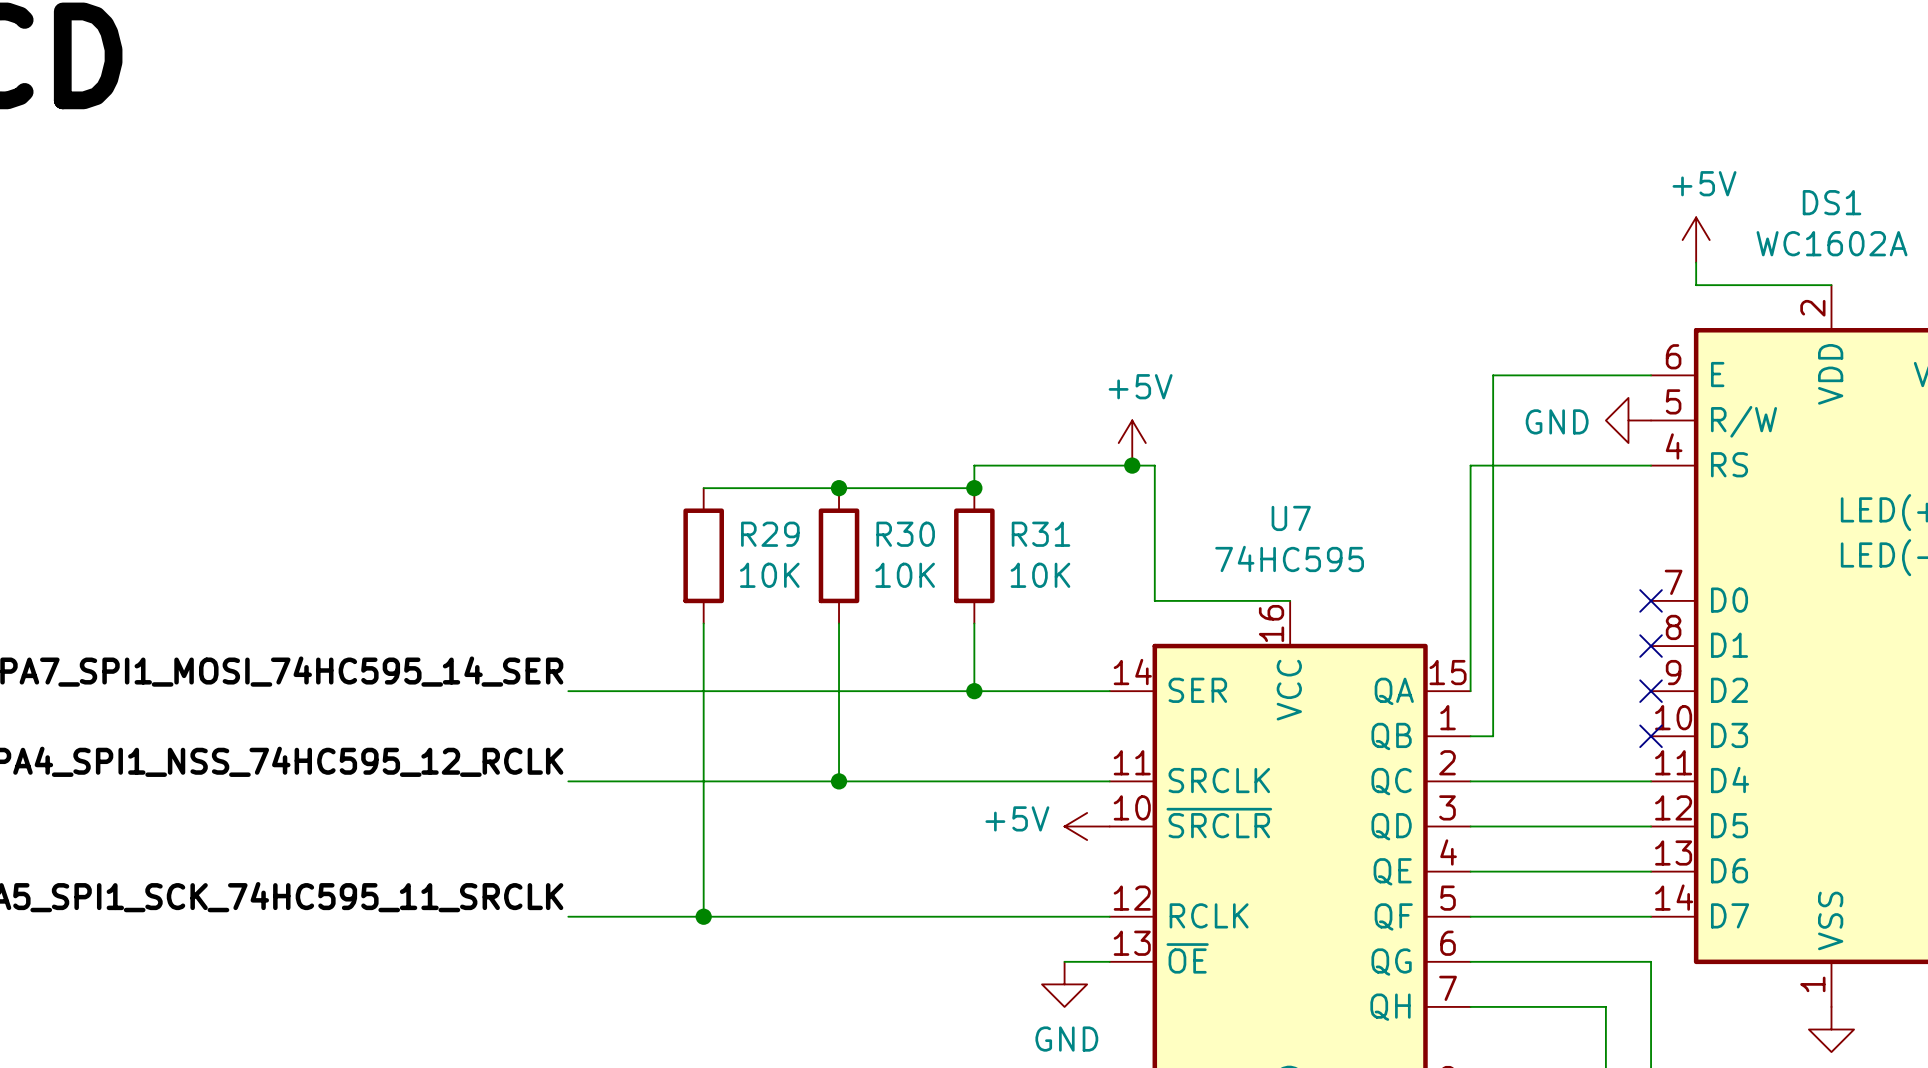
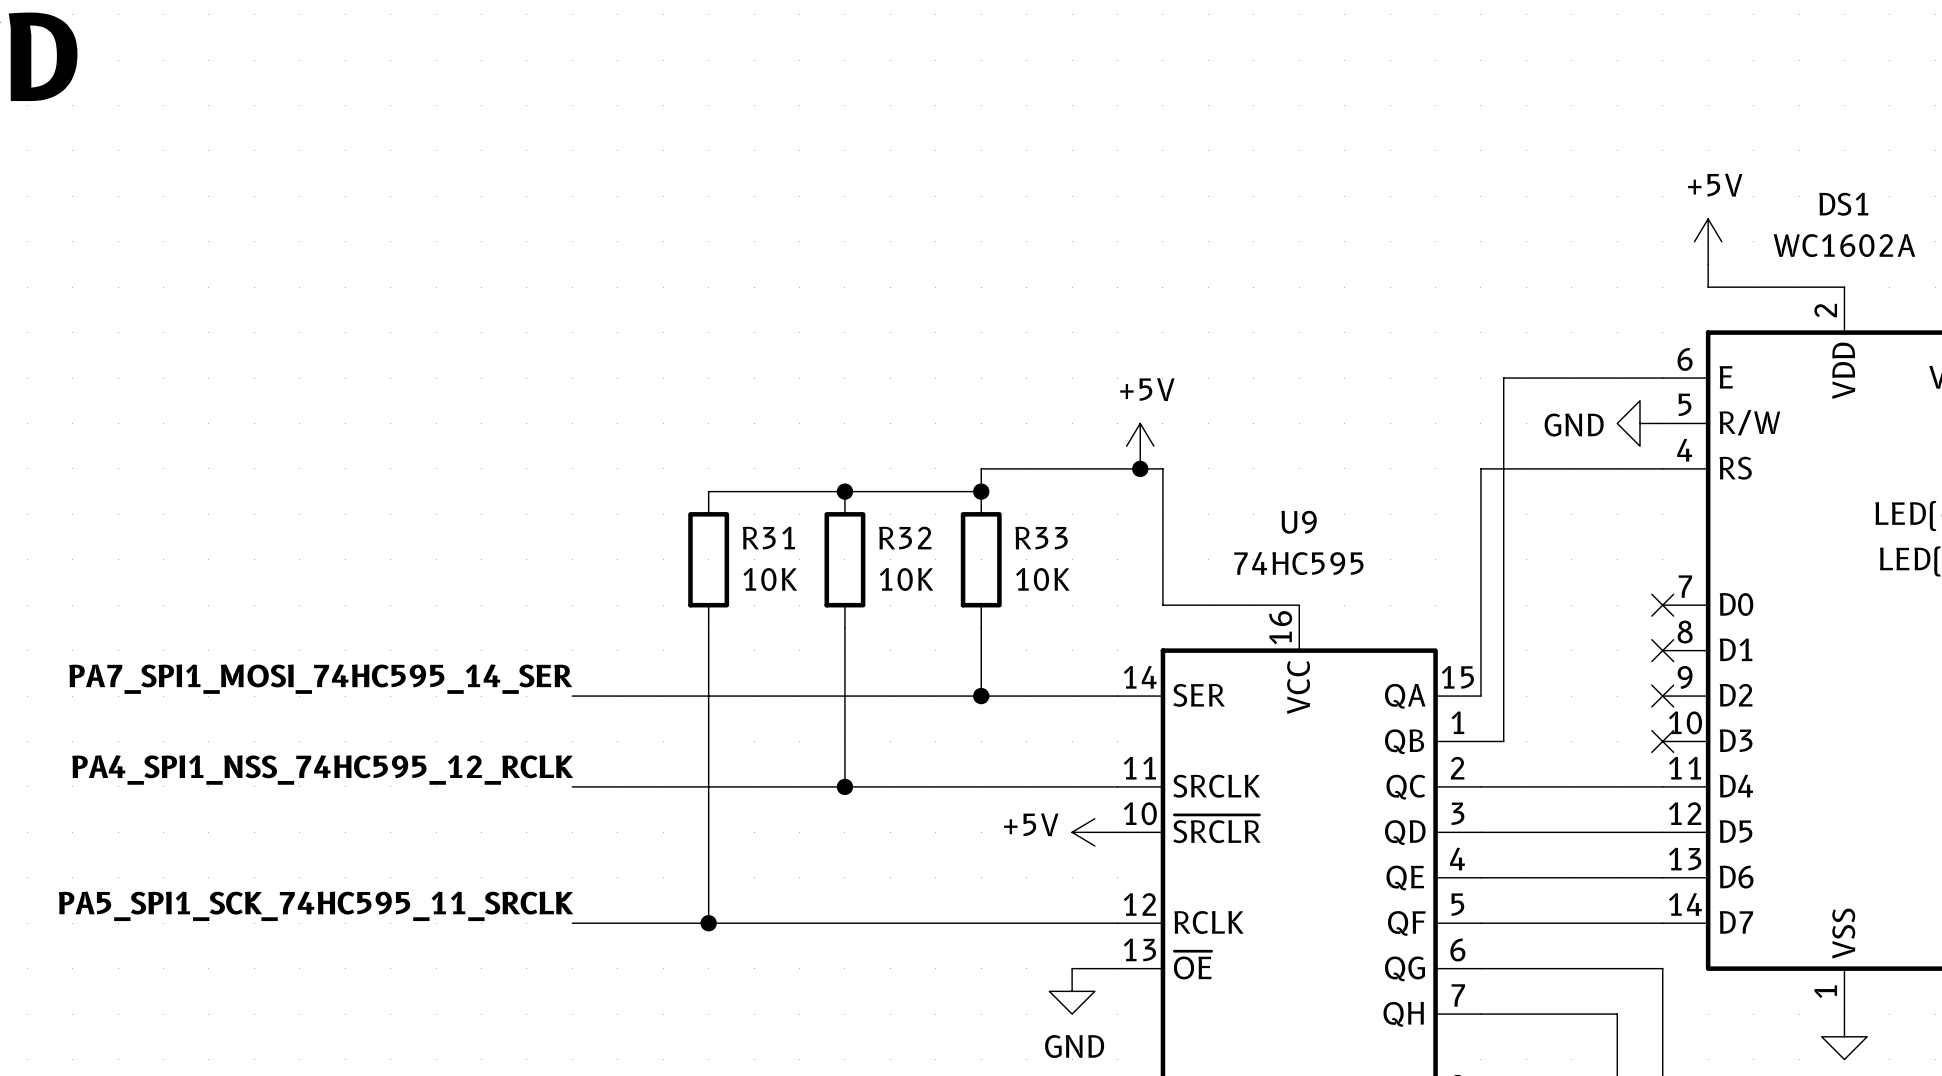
U7 name: U7 (1291, 518) -> U9 (1299, 522)
R29 name: R29 (770, 534) -> R31 (768, 538)
R30 name: R30 (905, 534) -> R32 (905, 538)
R31 name: R31 (1041, 534) -> R33 (1041, 538)

